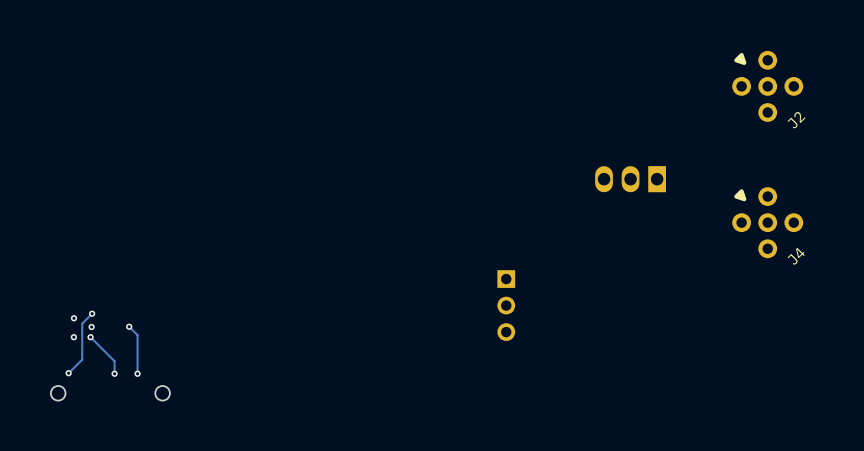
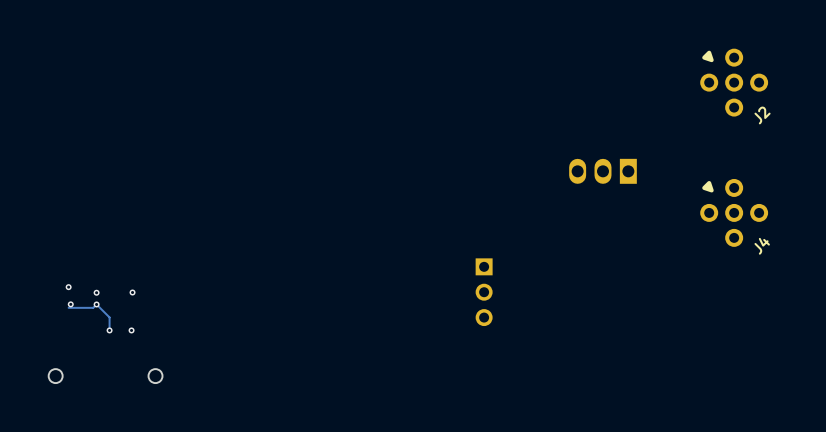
via: none -> (68, 287)
via: none -> (132, 292)
via: none -> (96, 292)
track: (92, 313) (82, 323) (82, 359) (68, 373) -> none
via: (92, 313) -> none
via: none -> (96, 304)
track: none -> (68, 307) (93, 307) (96, 304) (109, 317) (109, 330)
track: (129, 326) (137, 335) (137, 373) -> none
via: (129, 326) -> none
via: (91, 327) -> none
via: (73, 337) -> none
track: (90, 337) (114, 361) (114, 373) -> none
via: (90, 337) -> none
via: none -> (109, 330)
via: none -> (131, 330)
via: (68, 373) -> none
via: (114, 373) -> none
via: (137, 373) -> none

